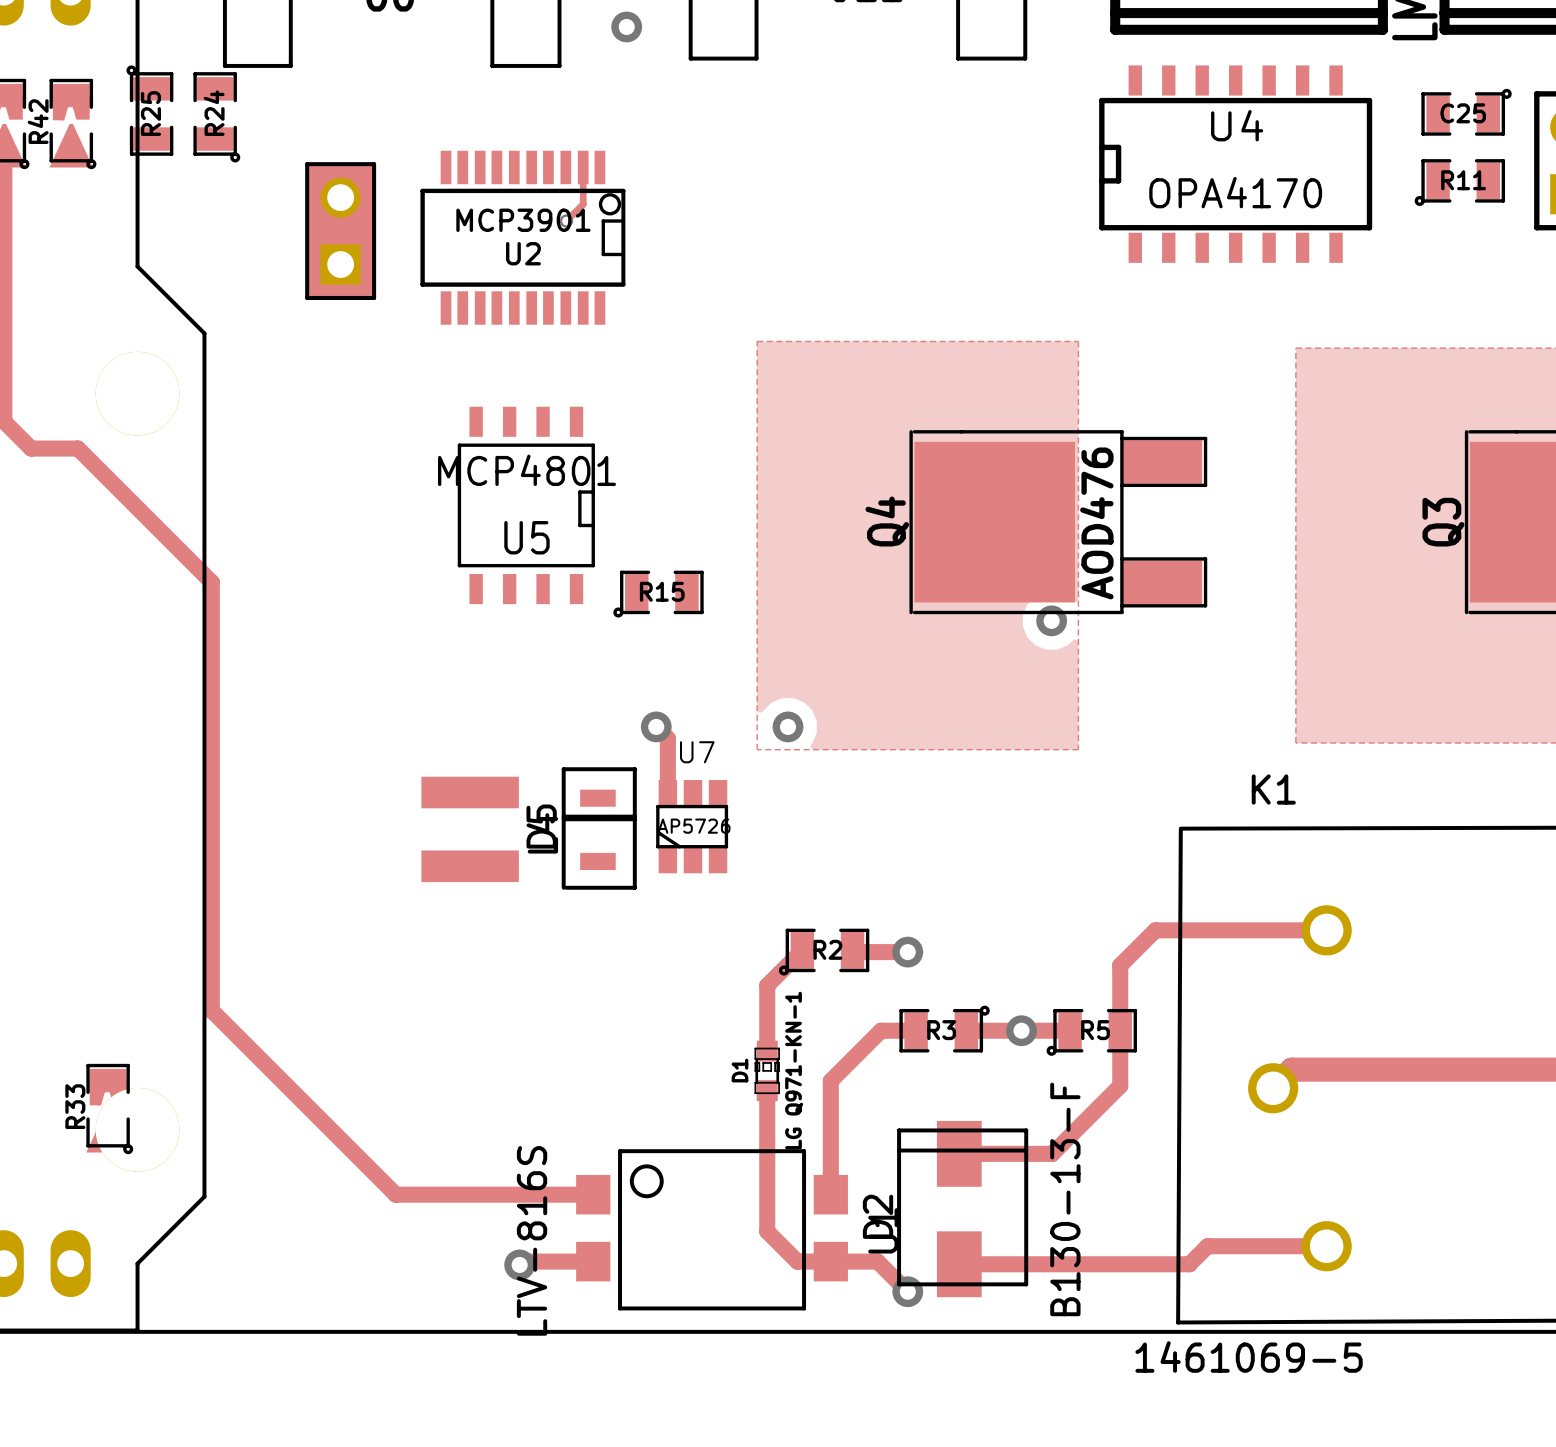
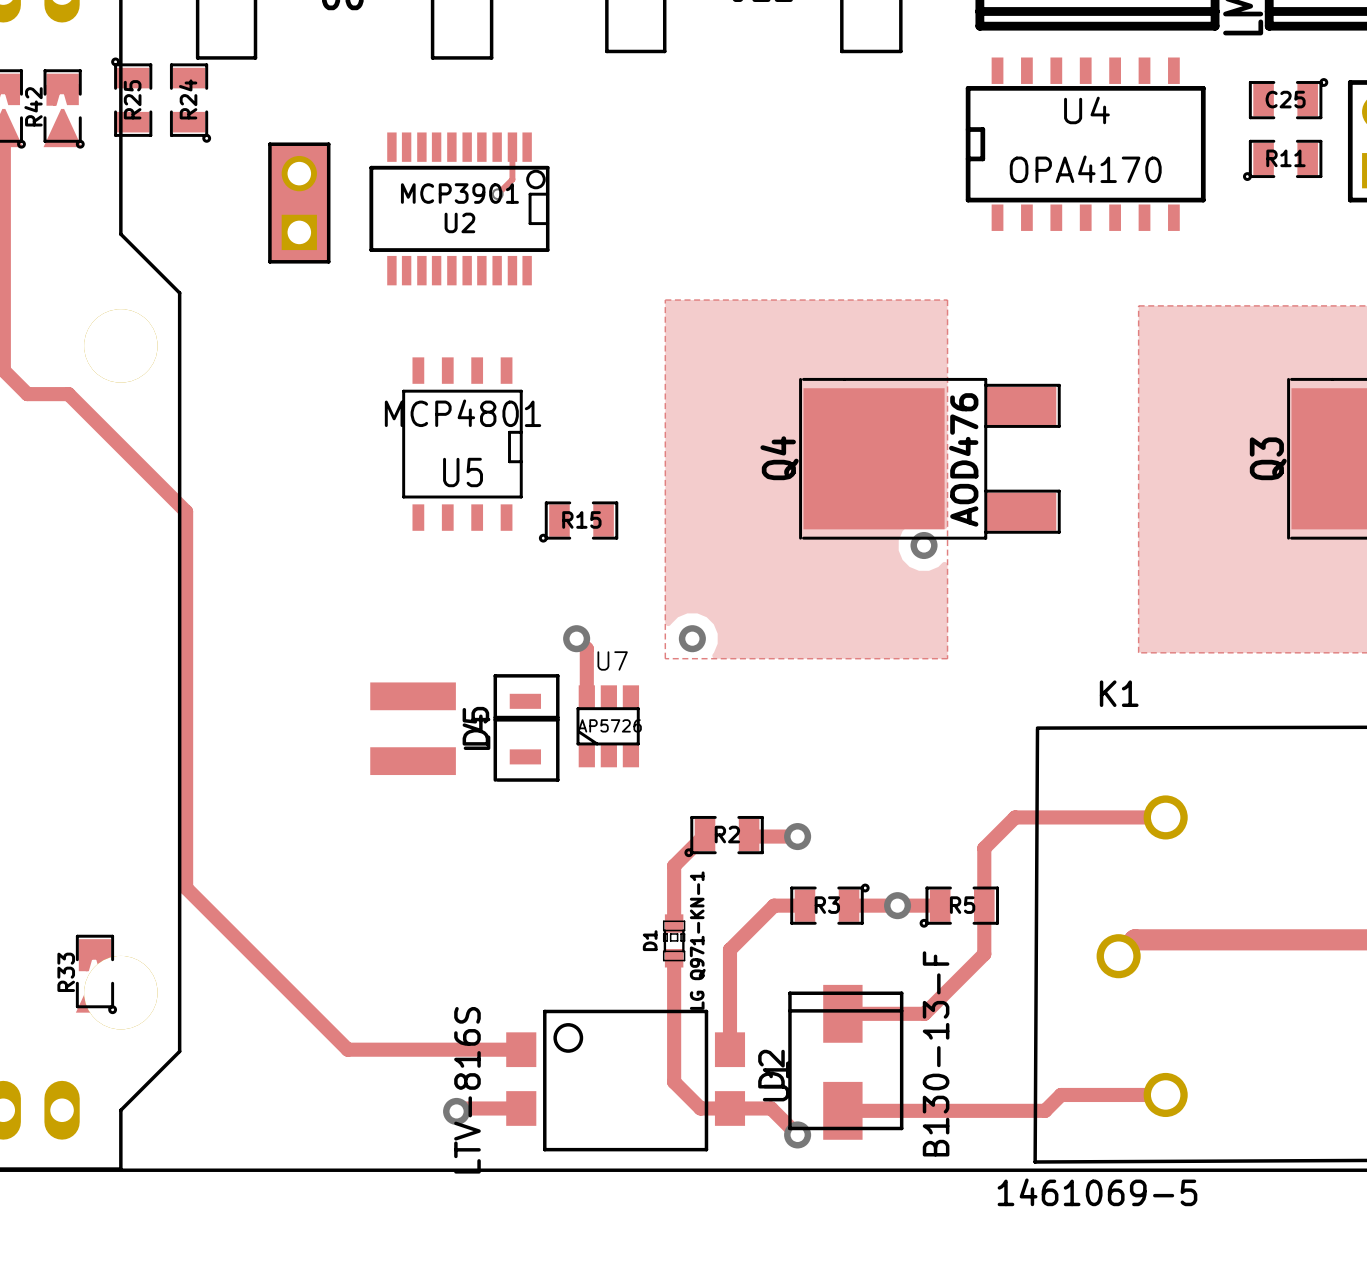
via: (626, 26) -> none

